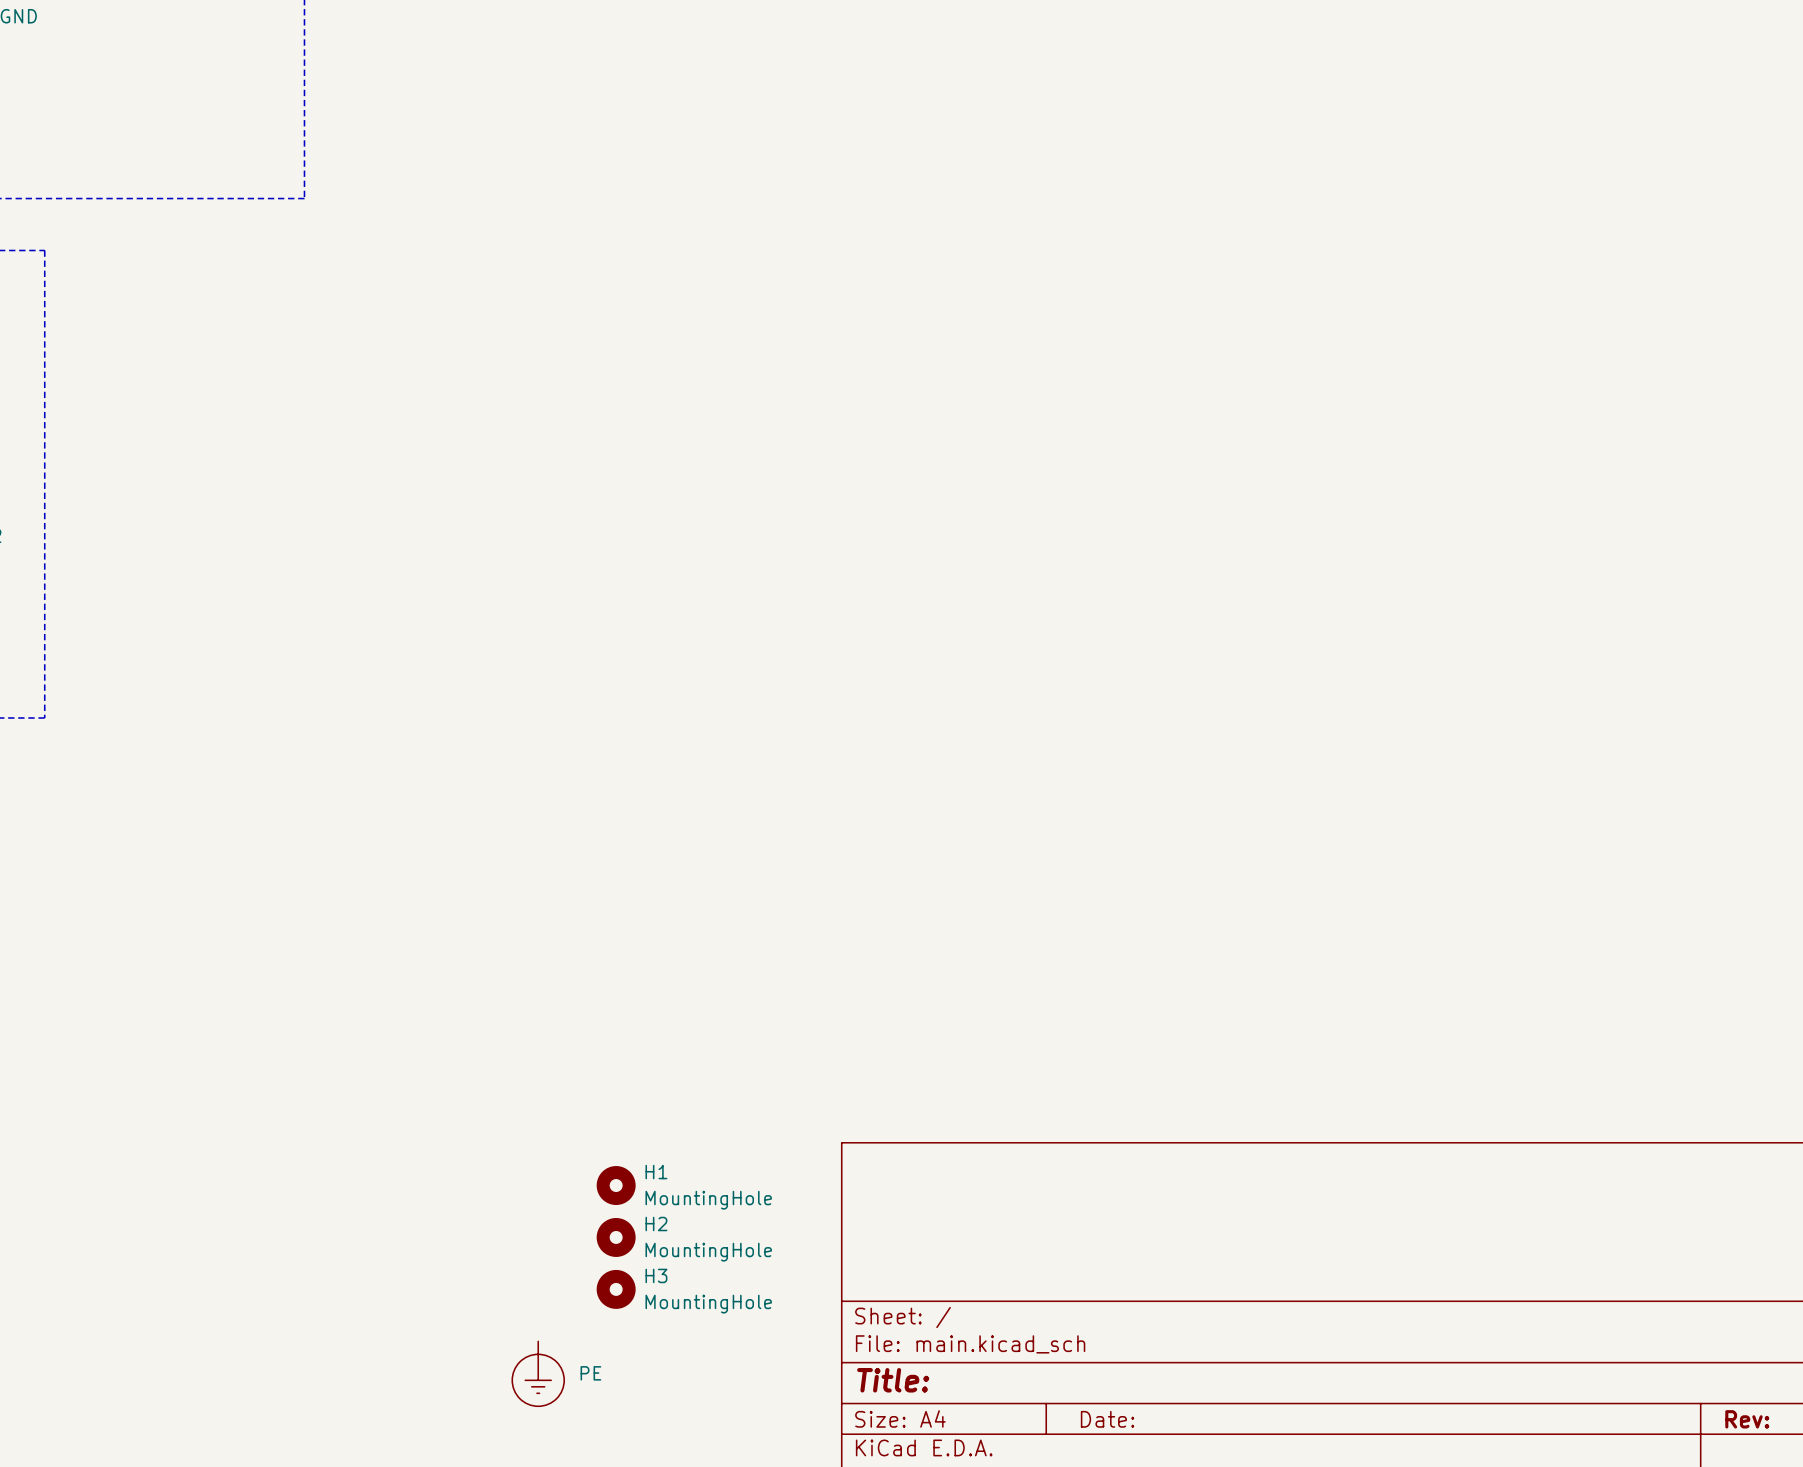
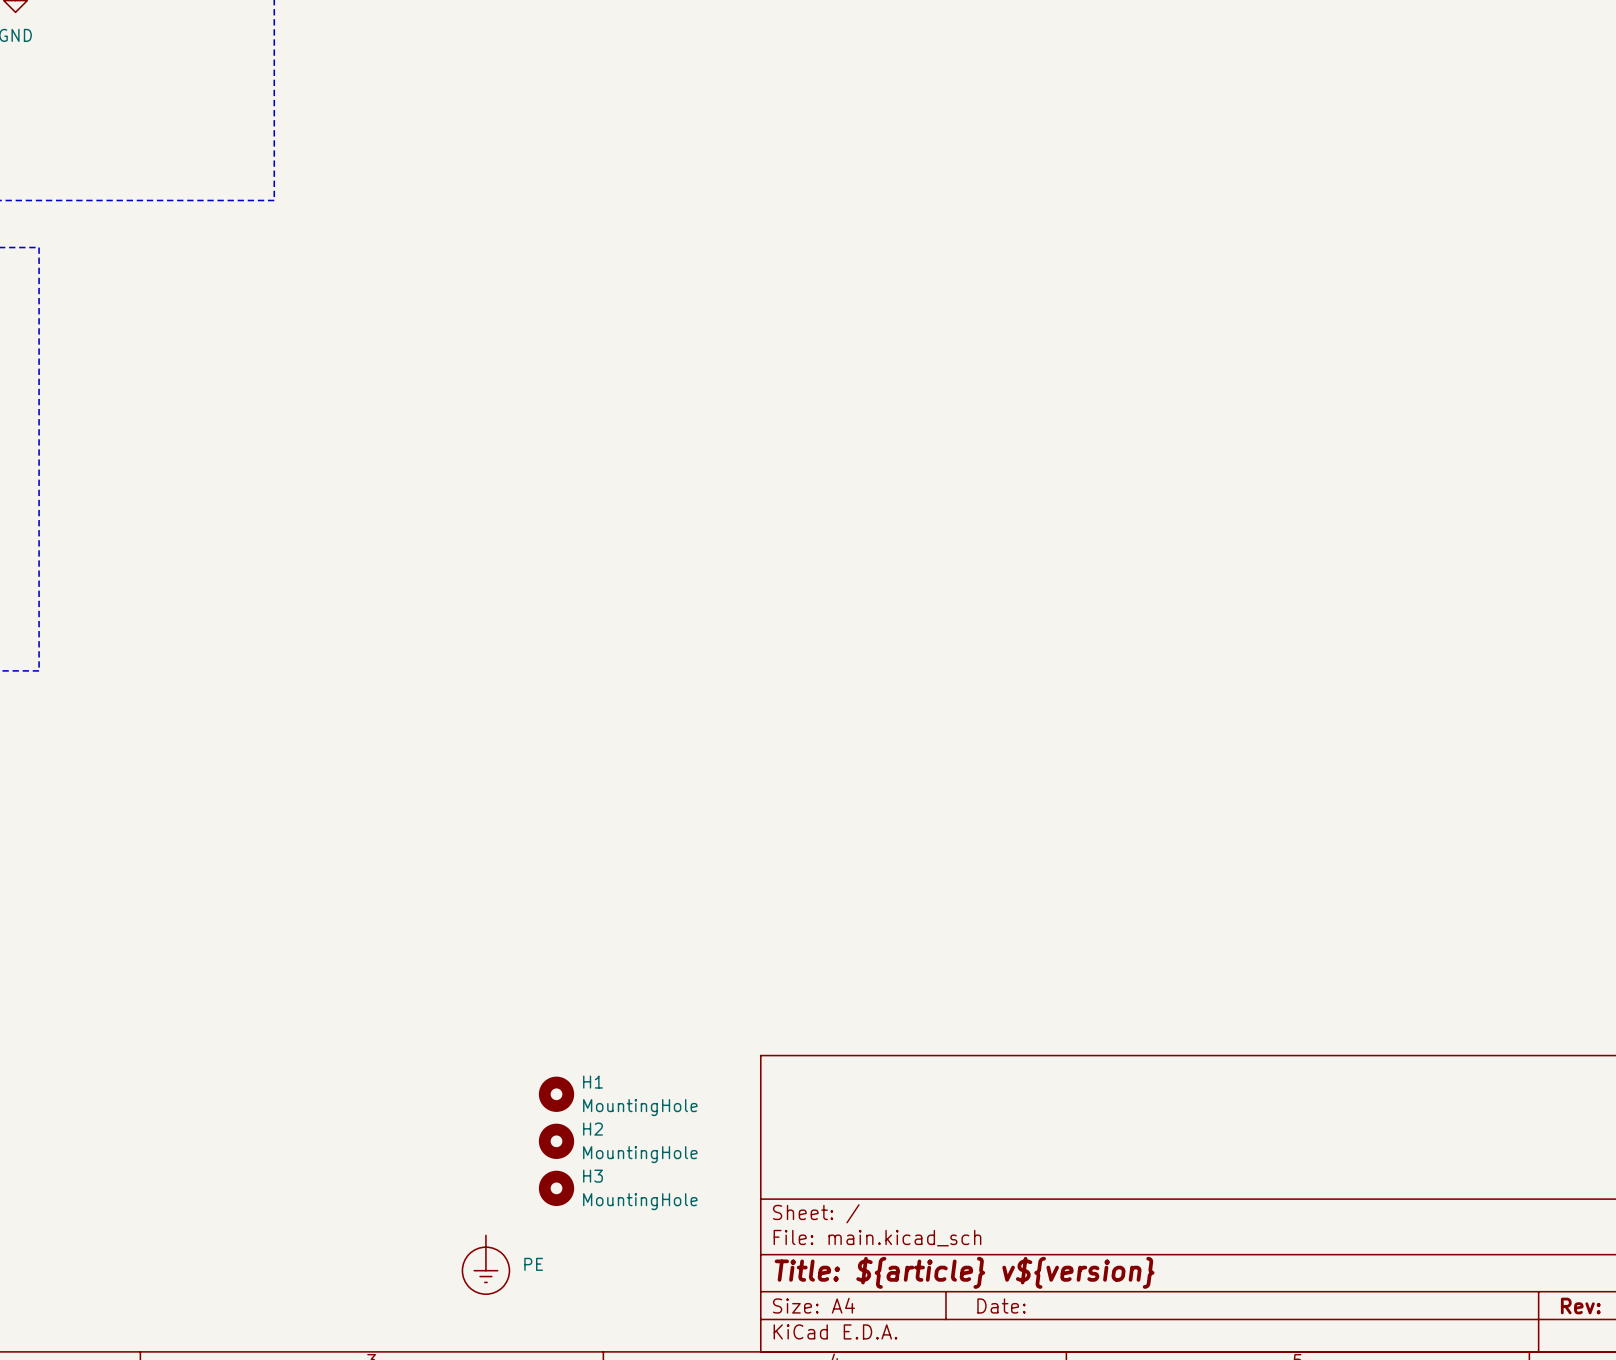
title block: Title: (893, 1380) -> Title: ${article} v${version} (964, 1272)

